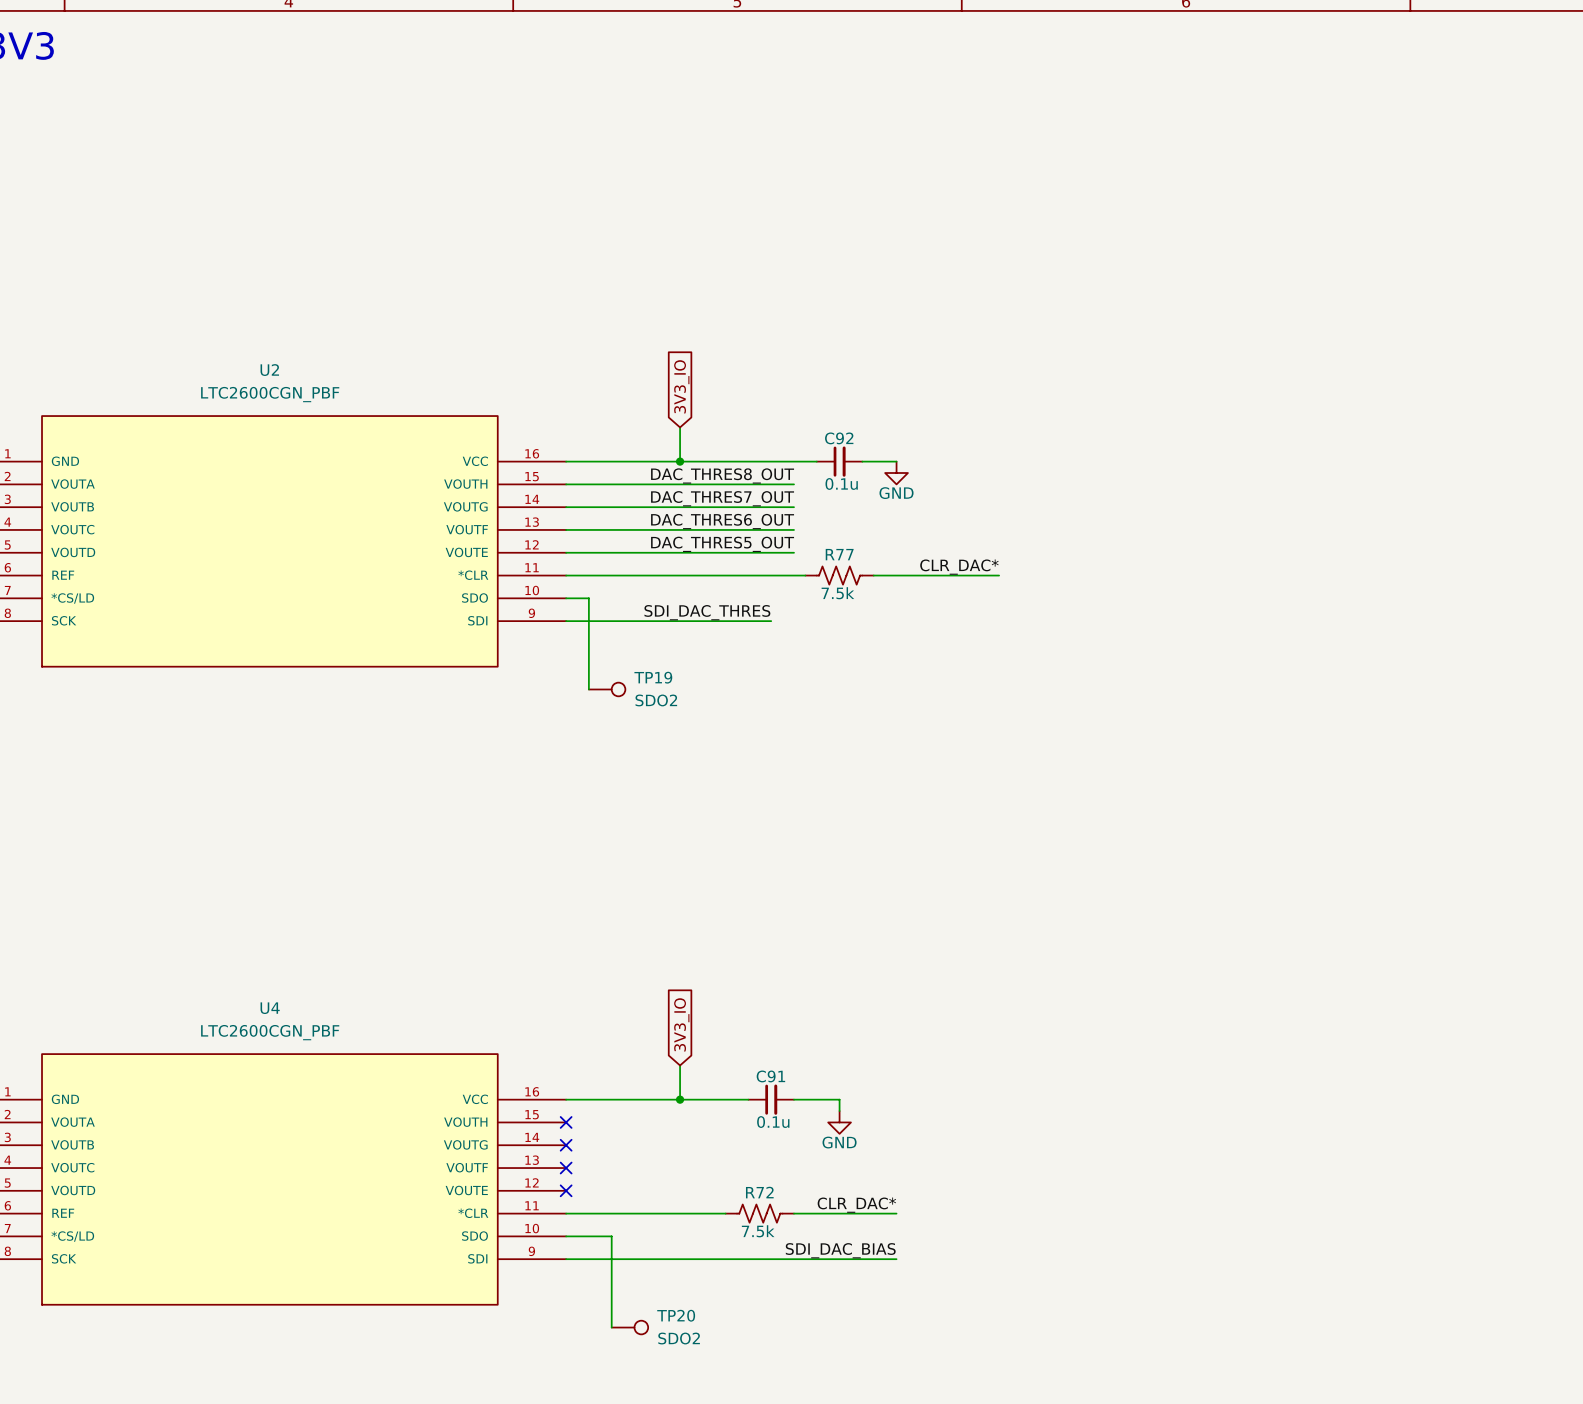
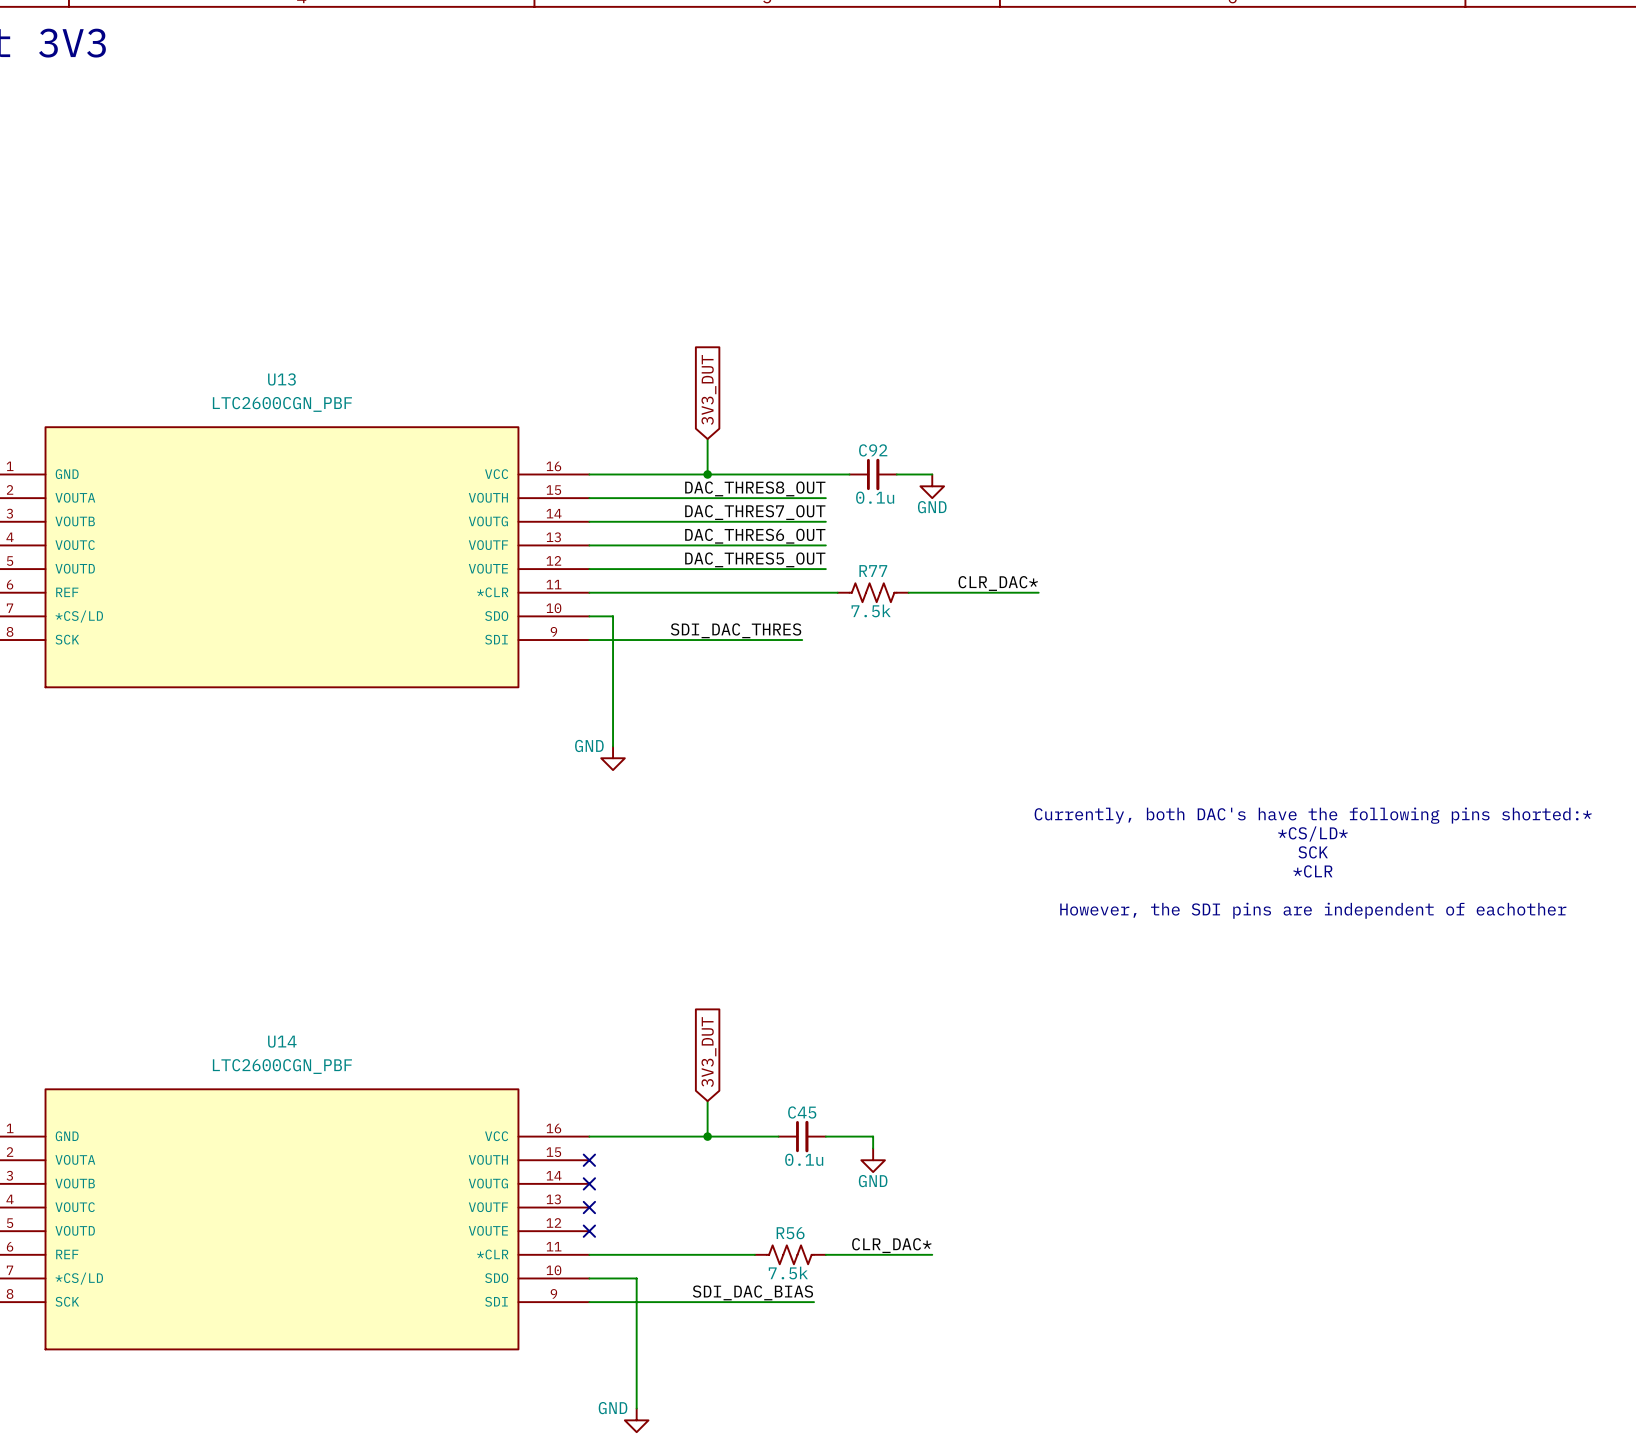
U2 name: U2 (269, 370) -> U13 (281, 379)
global label: 3V3_IO (681, 386) -> 3V3_DUT (708, 389)
wire: none -> (613, 710) (613, 746)
TP19: SDO2 (607, 689) -> none
power symbol: none -> GND (613, 758)
text: none -> Currently, both DAC's have the following pins shorted:* (1313, 815)
text: none -> *CS/LD* (1312, 833)
text: none -> SCK (1313, 852)
text: none -> *CLR (1312, 871)
text: none -> However, the SDI pins are independent of eachother (1313, 910)
U4 name: U4 (270, 1008) -> U14 (282, 1041)
global label: 3V3_IO (681, 1024) -> 3V3_DUT (708, 1052)
C91 name: C91 (770, 1076) -> C45 (802, 1112)
R72 name: R72 (759, 1192) -> R56 (790, 1233)
label position: SDI_DAC_BIAS (840, 1250) -> SDI_DAC_BIAS (752, 1292)
wire: (782, 1259) (896, 1259) -> none
wire: none -> (636, 1373) (636, 1408)
TP20: SDO2 (629, 1327) -> none
power symbol: none -> GND (636, 1420)

